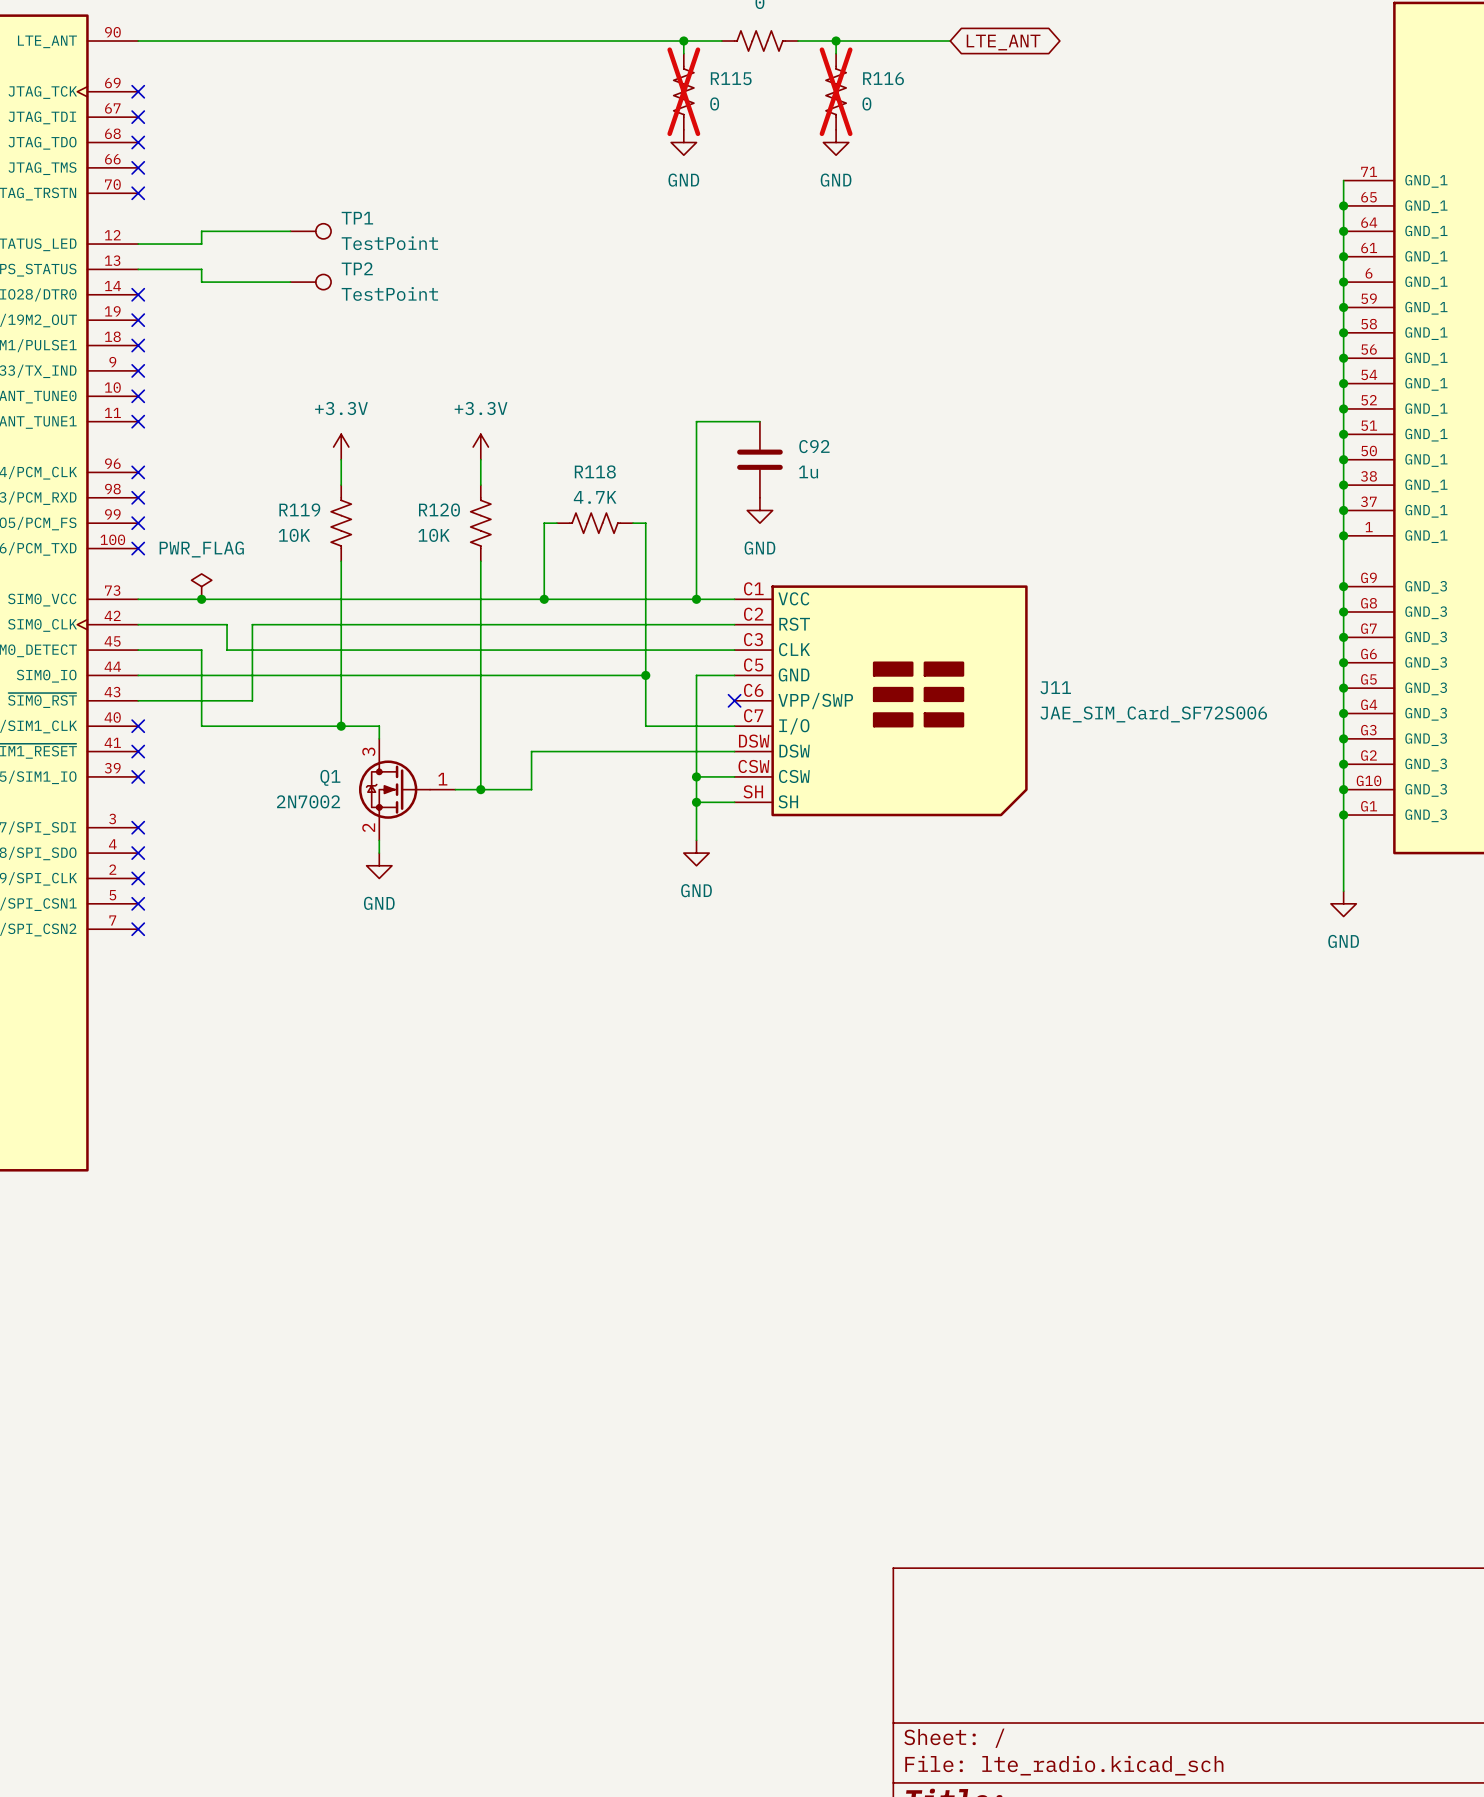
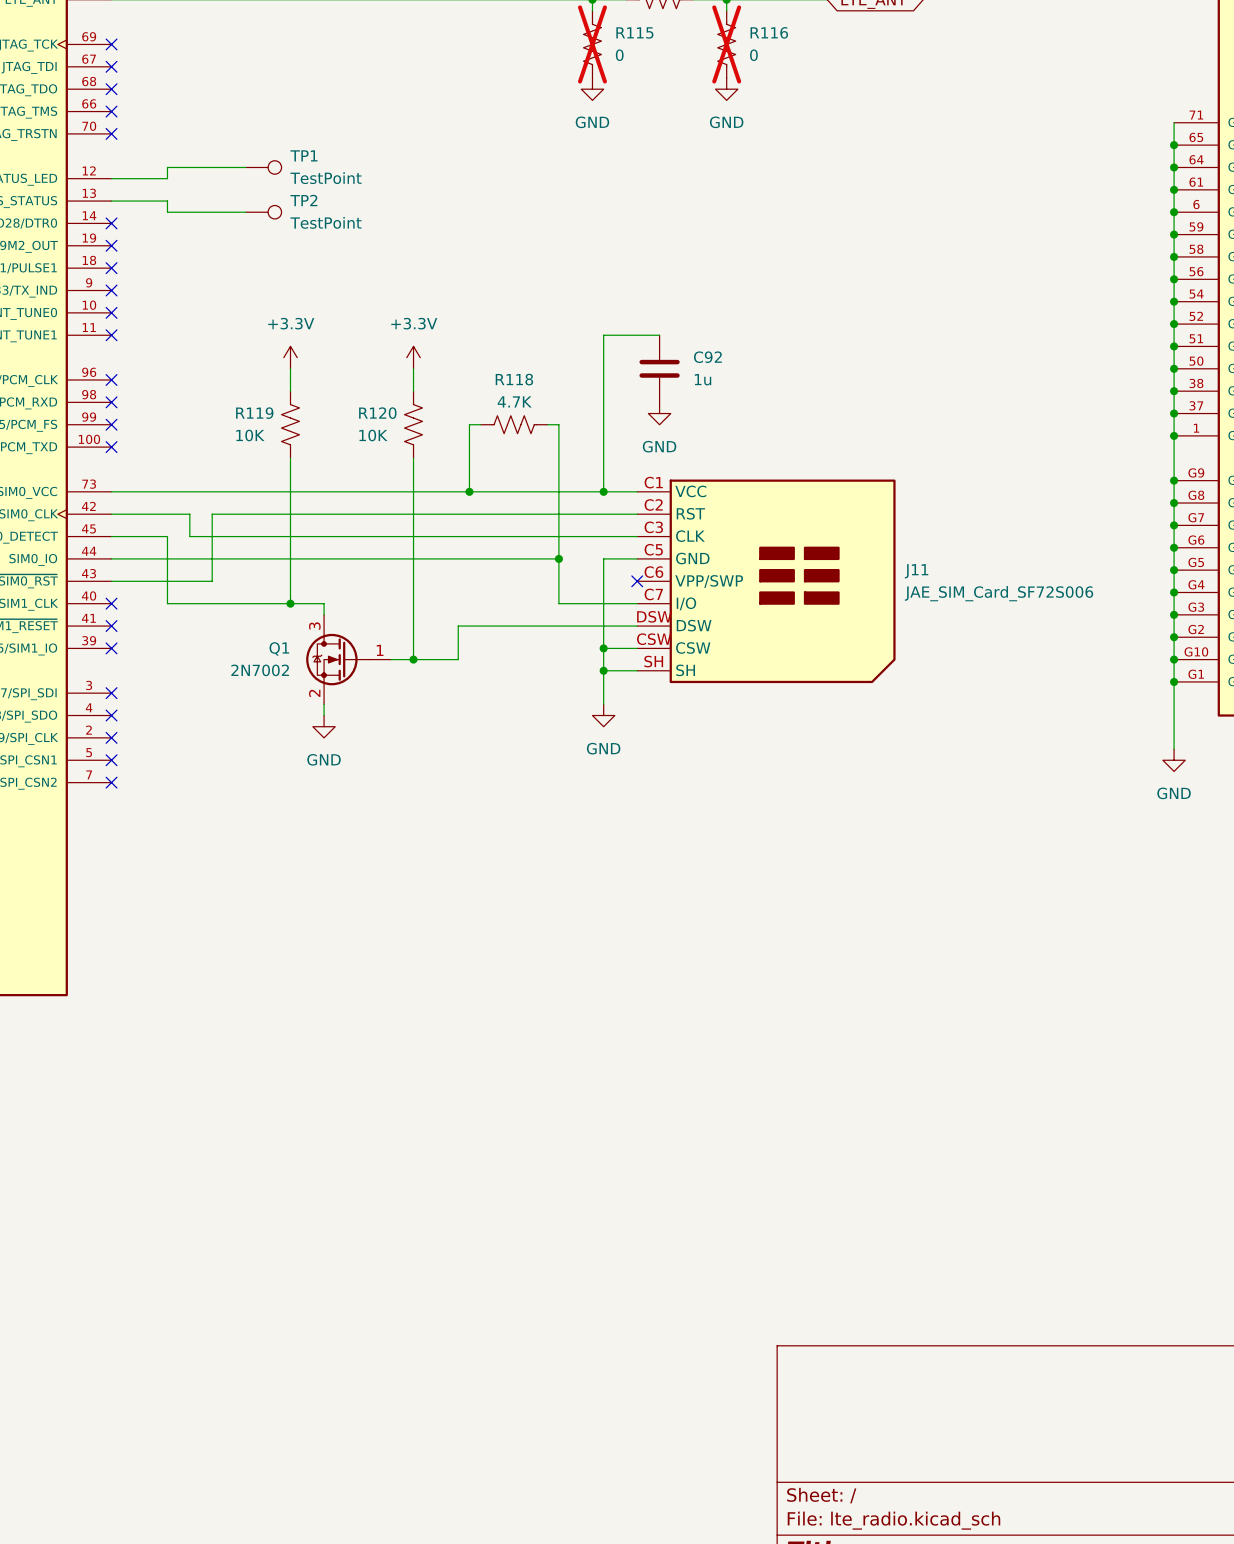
power symbol: PWR_FLAG (201, 586) -> none
junction: (201, 599) -> none

